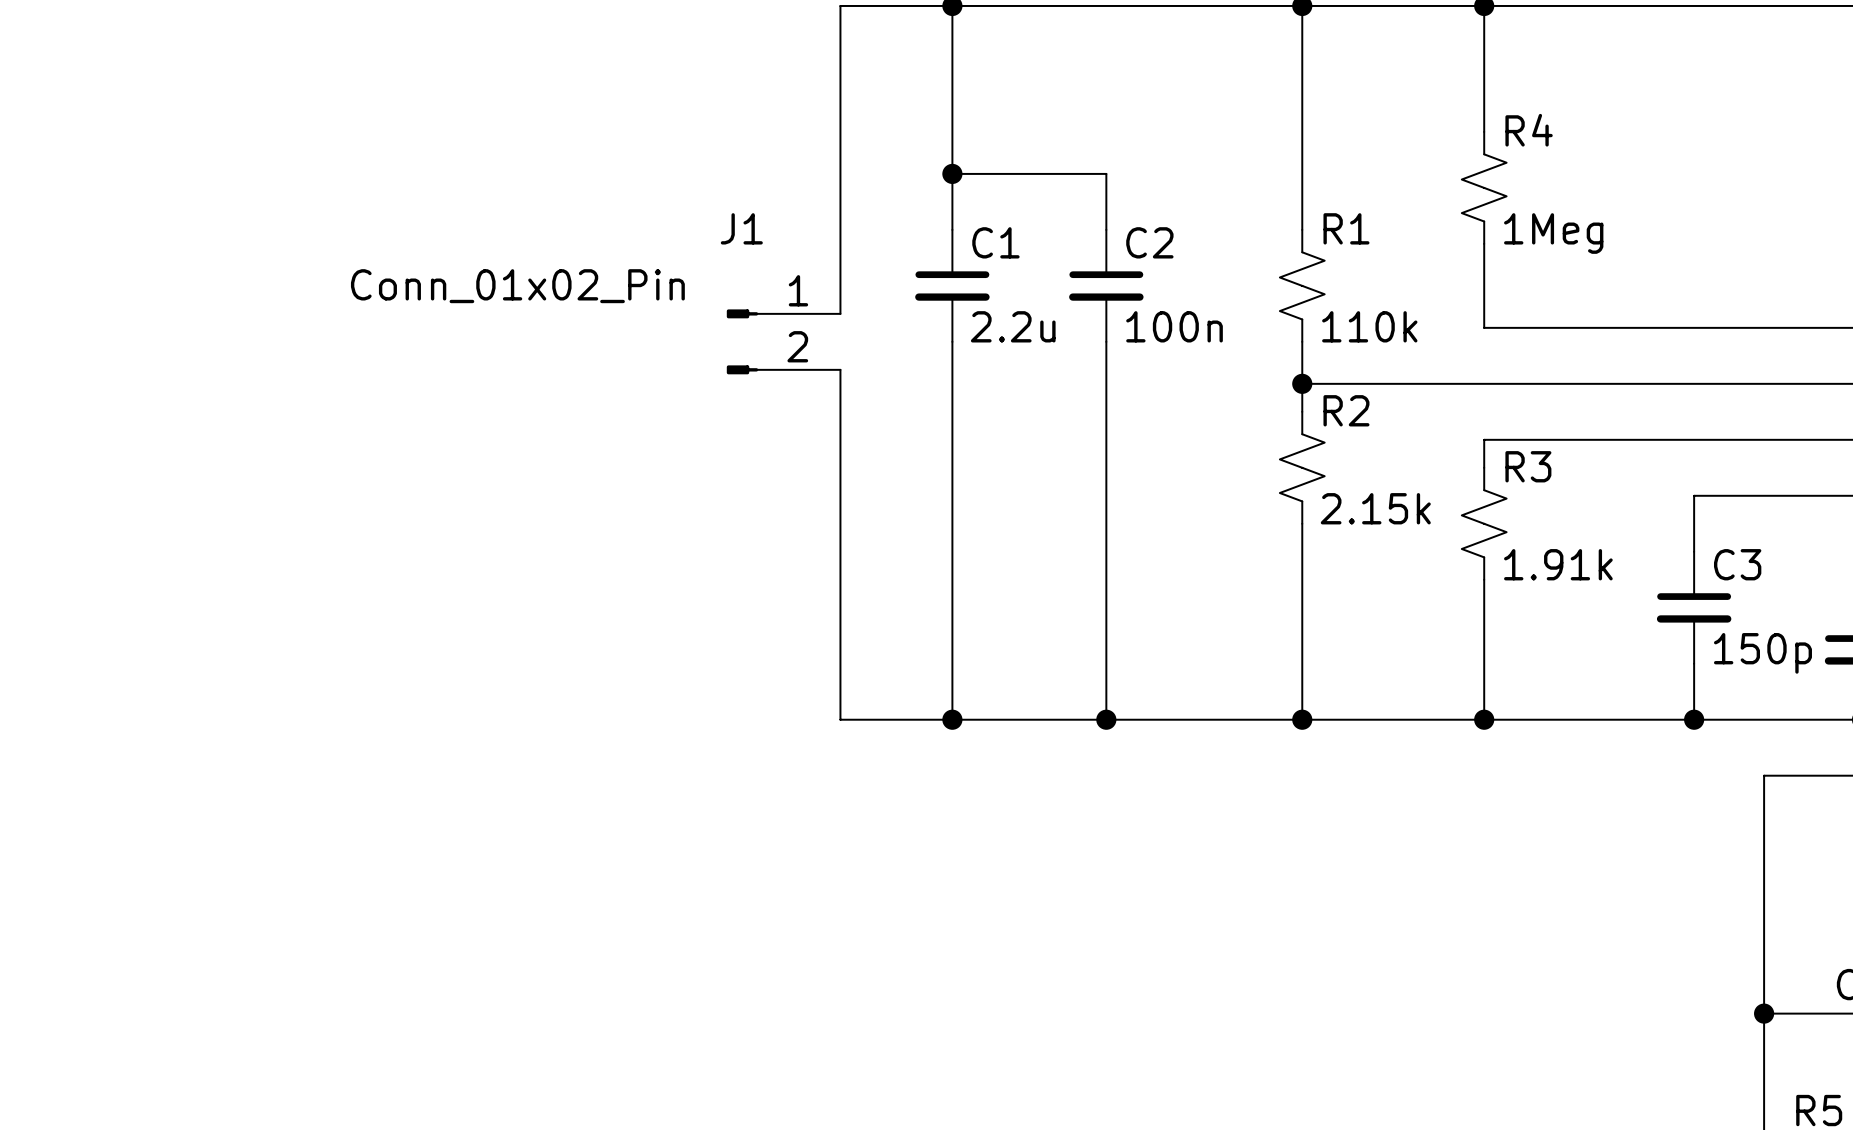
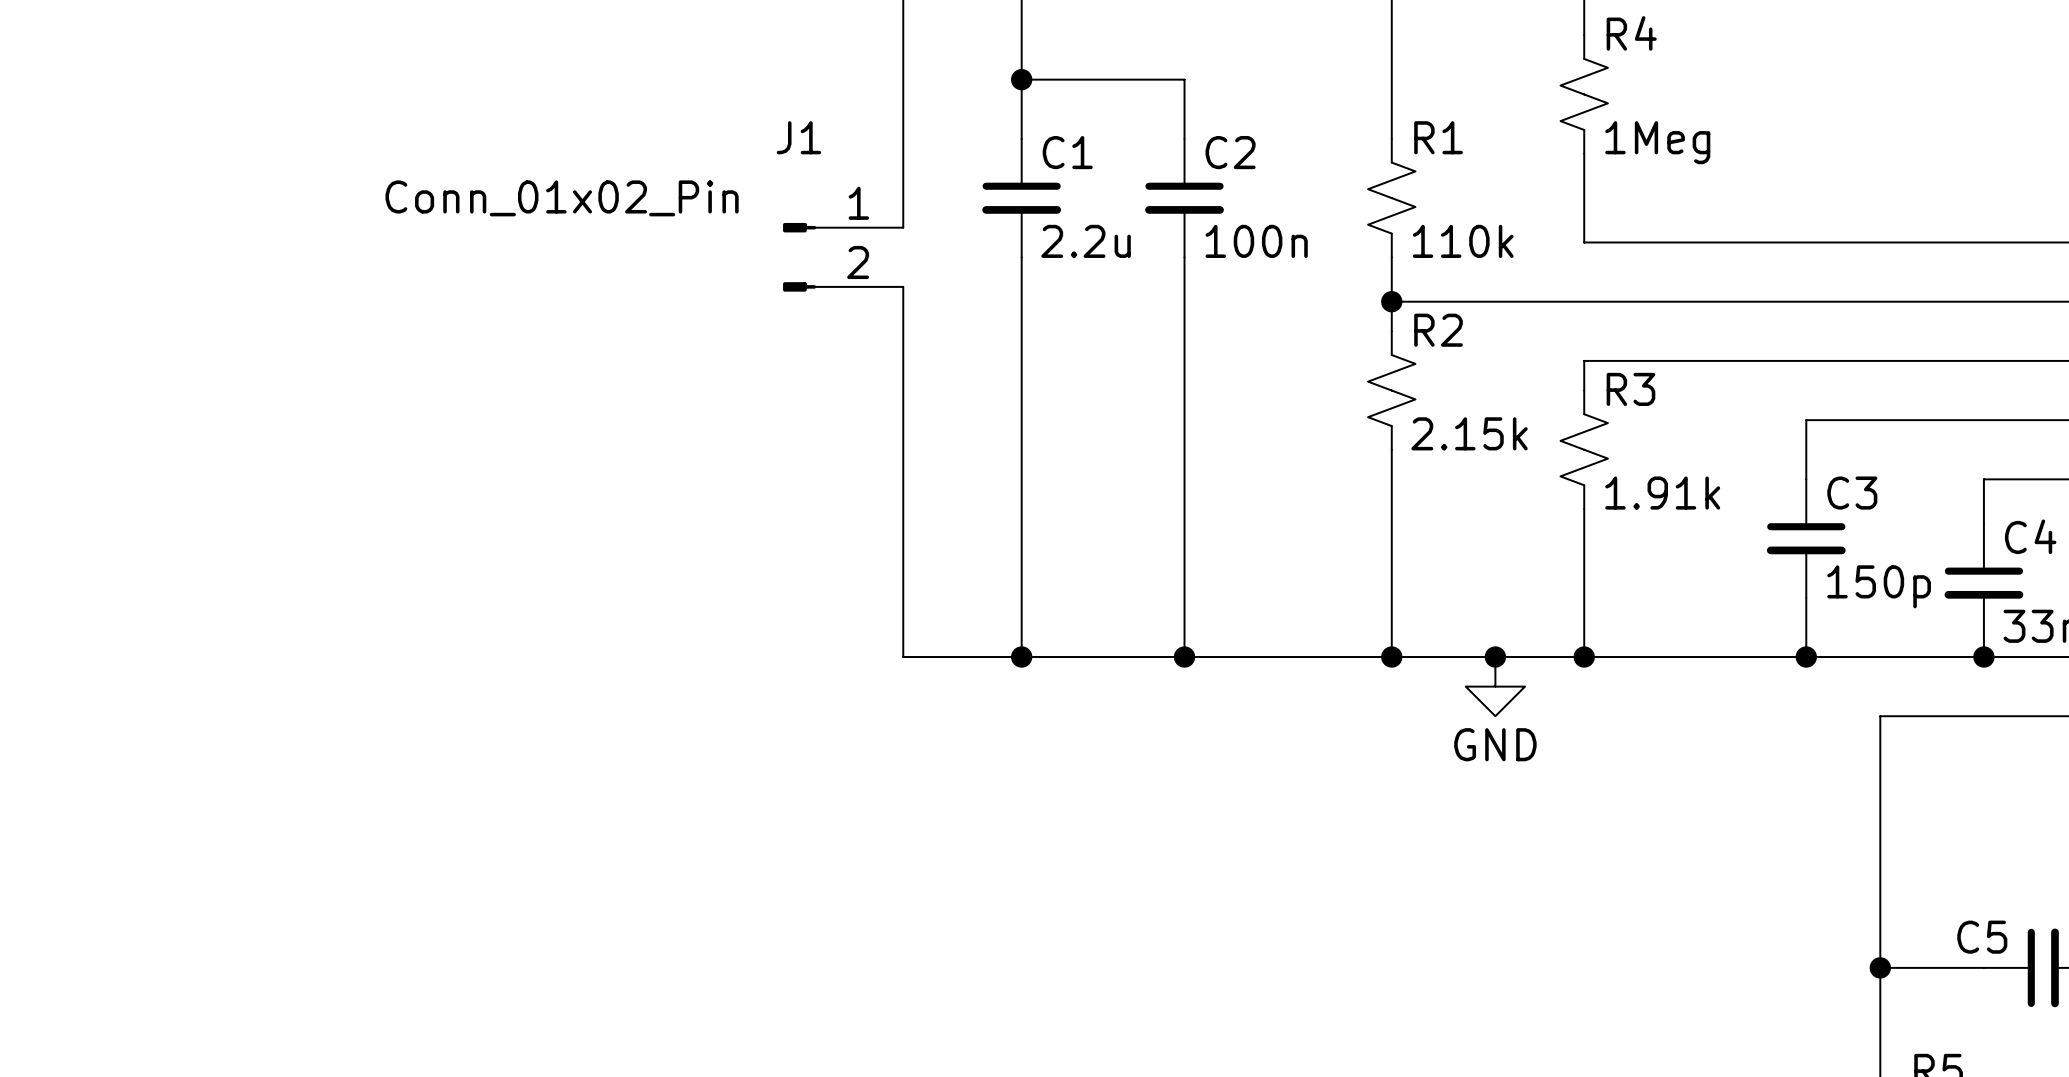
junction: none -> (1495, 657)
power symbol: none -> GND (1495, 686)

